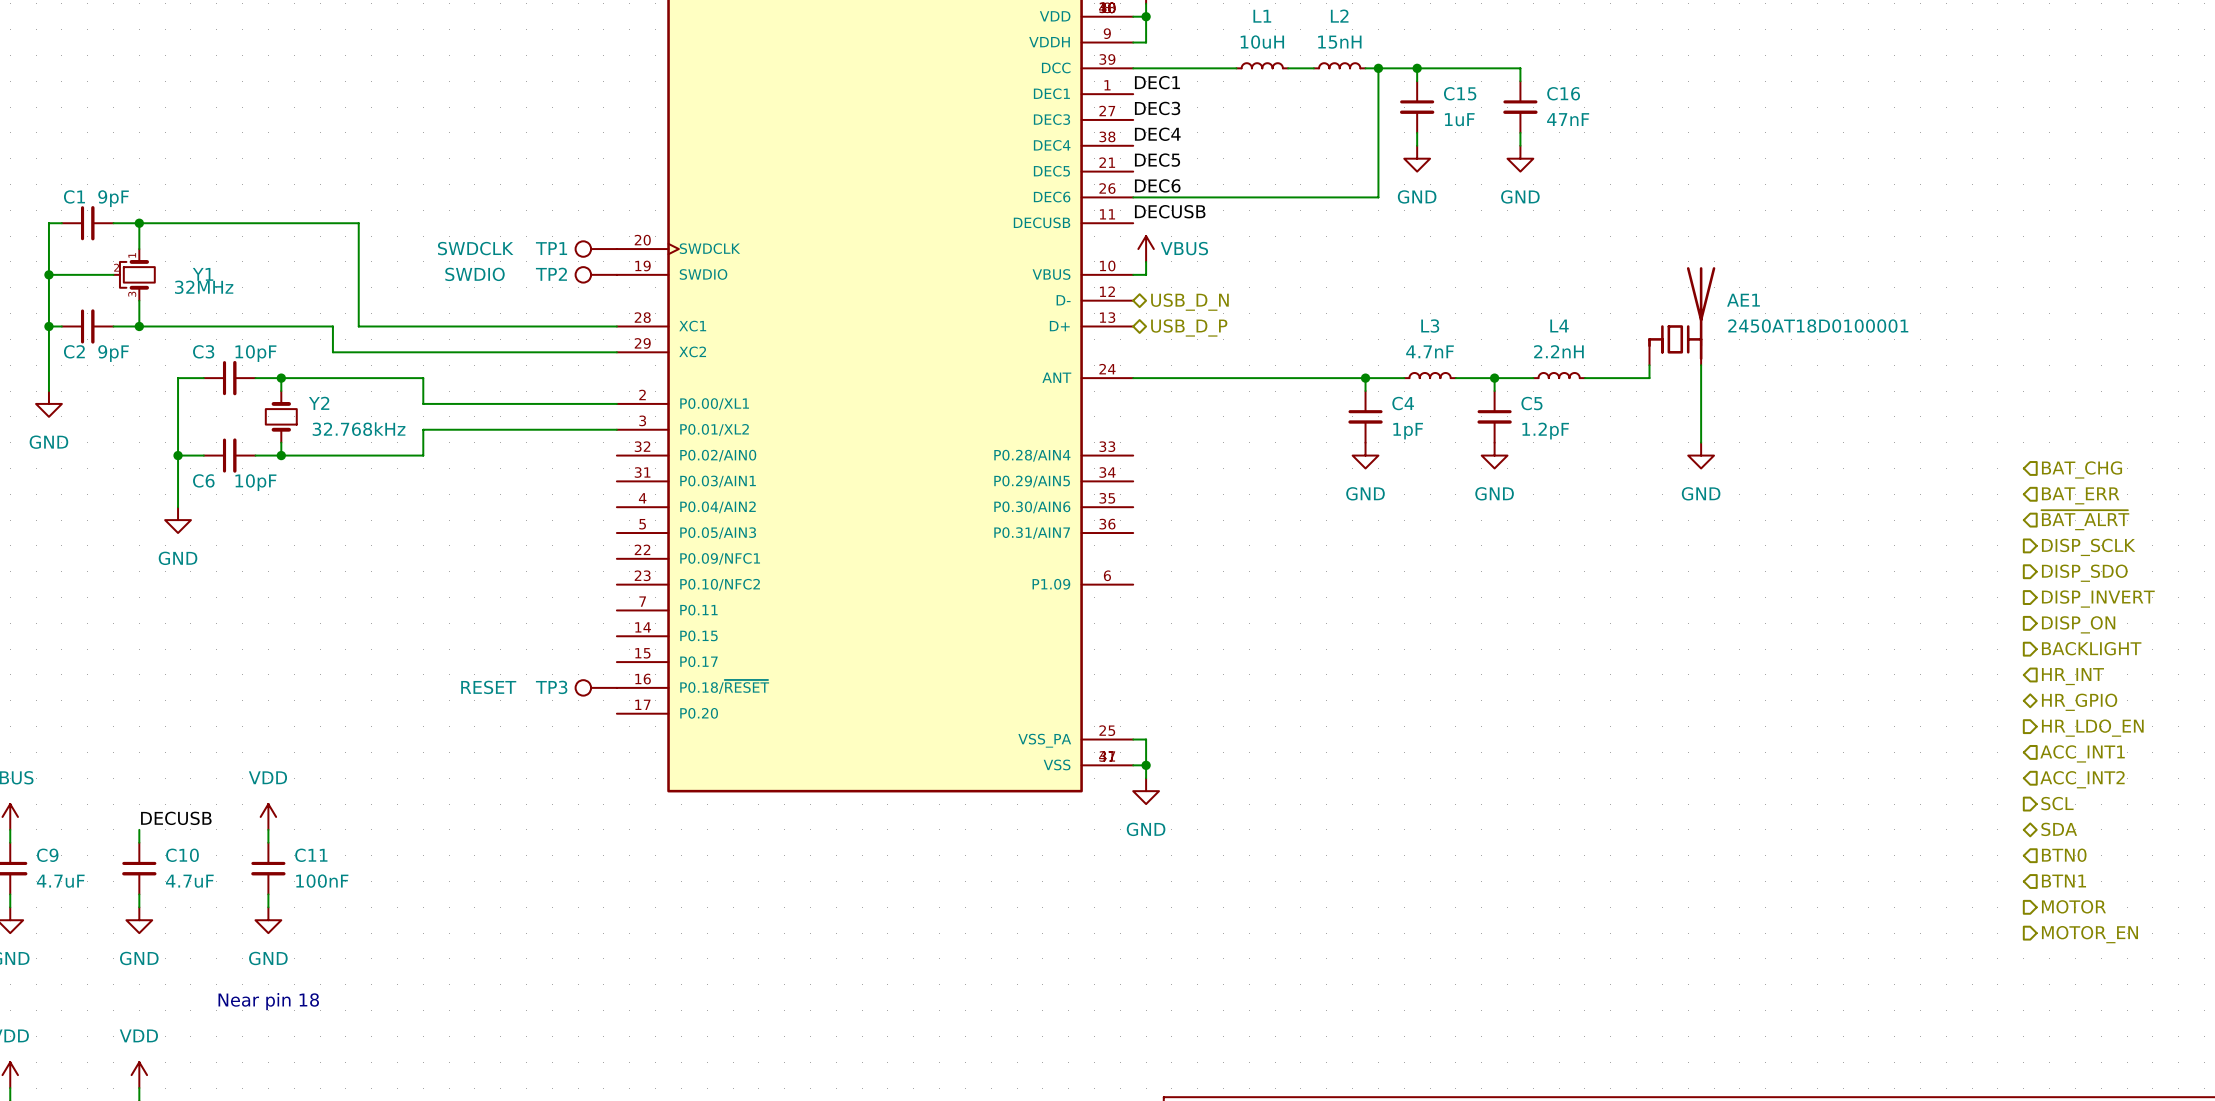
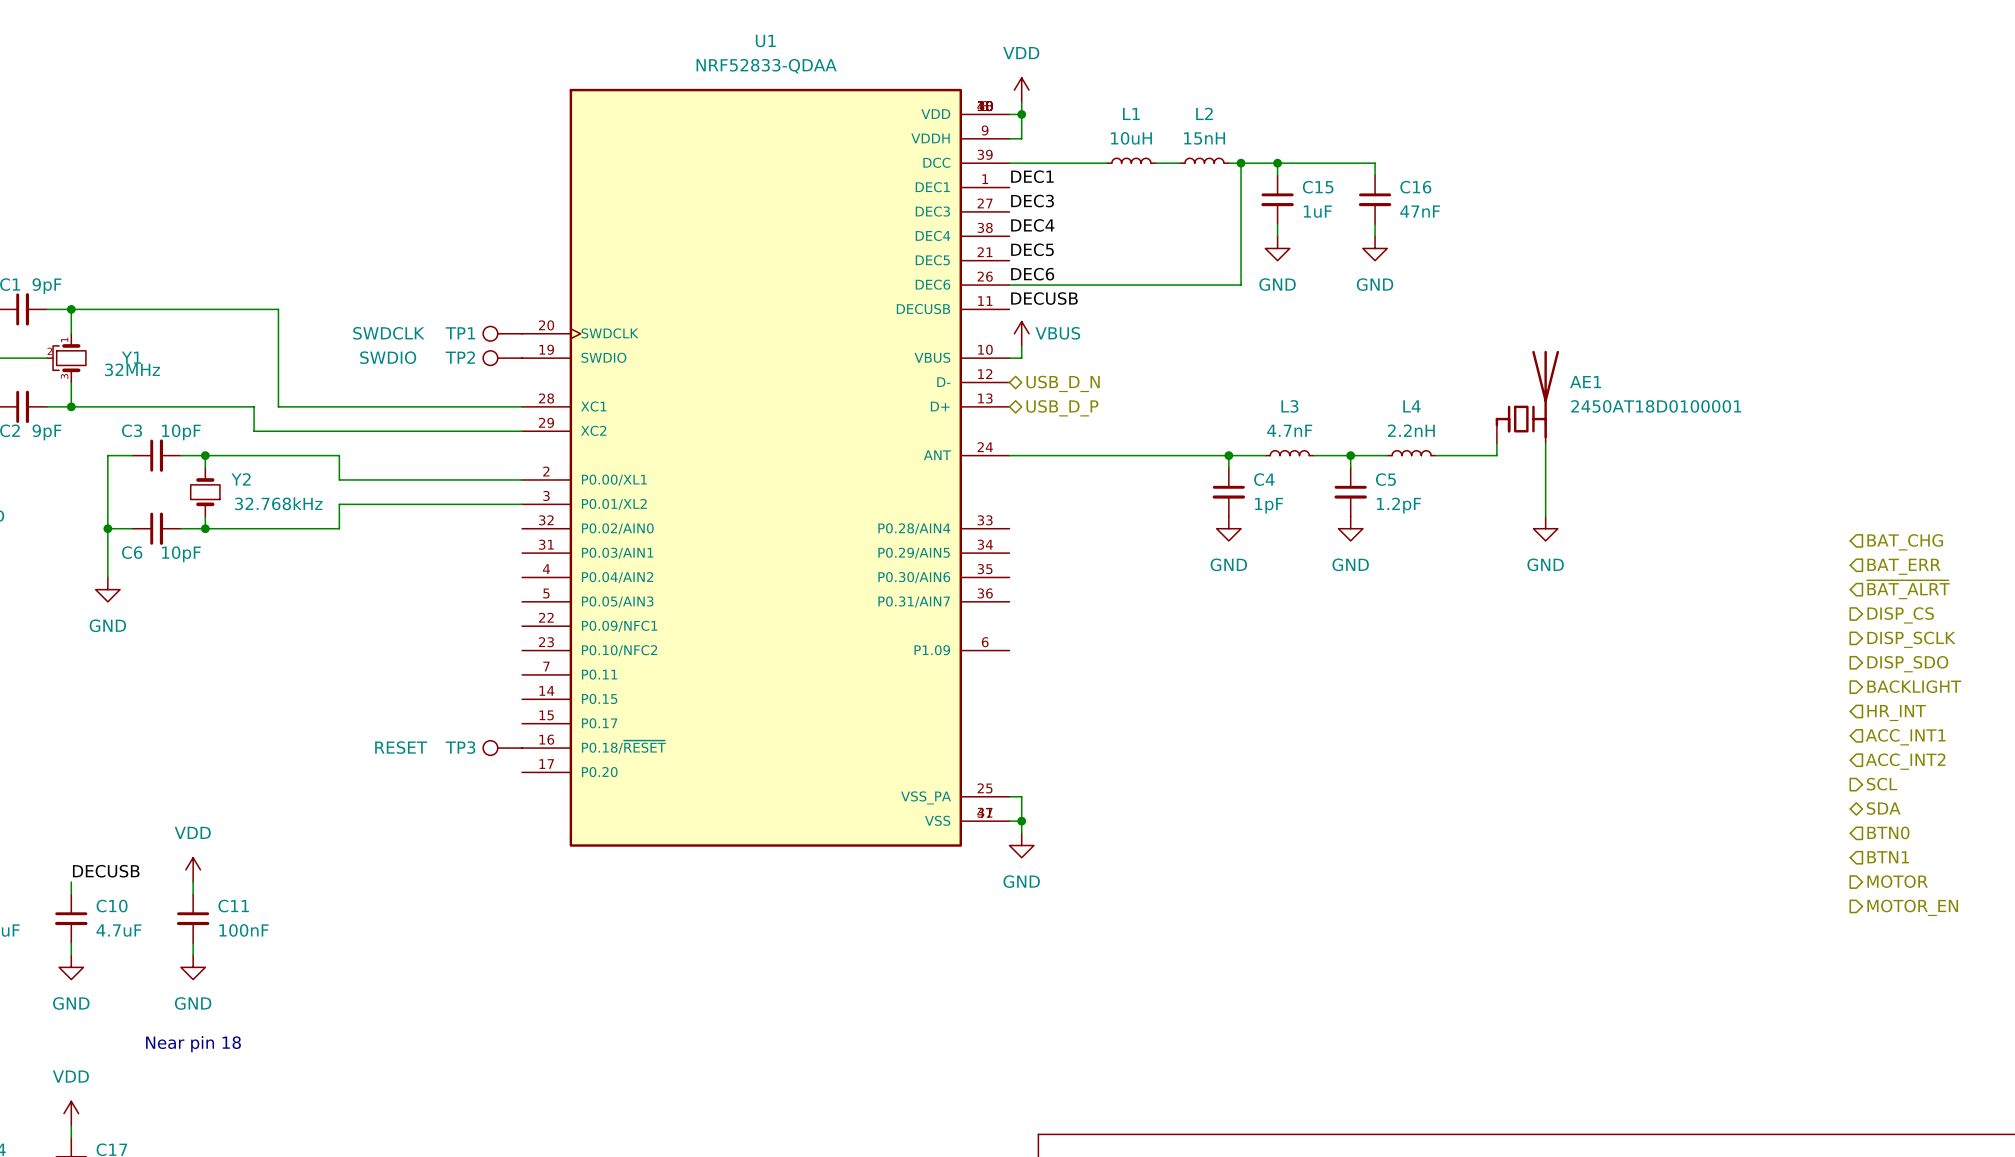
hierarchical label: DISP_SCLK (2088, 547) -> DISP_CS (1900, 615)
hierarchical label: DISP_SDO (2084, 573) -> DISP_SCLK (1911, 639)
hierarchical label: DISP_INVERT (2098, 599) -> DISP_SDO (1907, 664)
hierarchical label: DISP_ON (2078, 624) -> BACKLIGHT (1914, 686)
hierarchical label shape: output (2091, 648) -> input (1896, 713)
hierarchical label: BACKLIGHT (2091, 648) -> HR_INT (1896, 713)
hierarchical label: HR_INT (2072, 676) -> ACC_INT1 (1905, 737)
hierarchical label shape: bidirectional (2079, 702) -> input (1905, 761)
hierarchical label: HR_GPIO (2079, 702) -> ACC_INT2 (1905, 761)
hierarchical label: HR_LDO_EN (2092, 728) -> SCL (1882, 784)
hierarchical label shape: input (2082, 753) -> bidirectional (1883, 808)
hierarchical label: ACC_INT1 (2082, 753) -> SDA (1883, 808)
hierarchical label: ACC_INT2 (2082, 779) -> BTN0 (1888, 832)
hierarchical label shape: output (2057, 803) -> input (1888, 857)
hierarchical label: SCL (2057, 803) -> BTN1 (1888, 857)
hierarchical label shape: bidirectional (2059, 829) -> output (1897, 881)
hierarchical label: SDA (2059, 829) -> MOTOR (1897, 881)
hierarchical label shape: input (2064, 855) -> output (1912, 907)
hierarchical label: BTN0 (2064, 855) -> MOTOR_EN (1912, 907)
hierarchical label: BTN1 (2063, 881) -> none
hierarchical label: MOTOR (2073, 906) -> none
hierarchical label: MOTOR_EN (2089, 934) -> none

